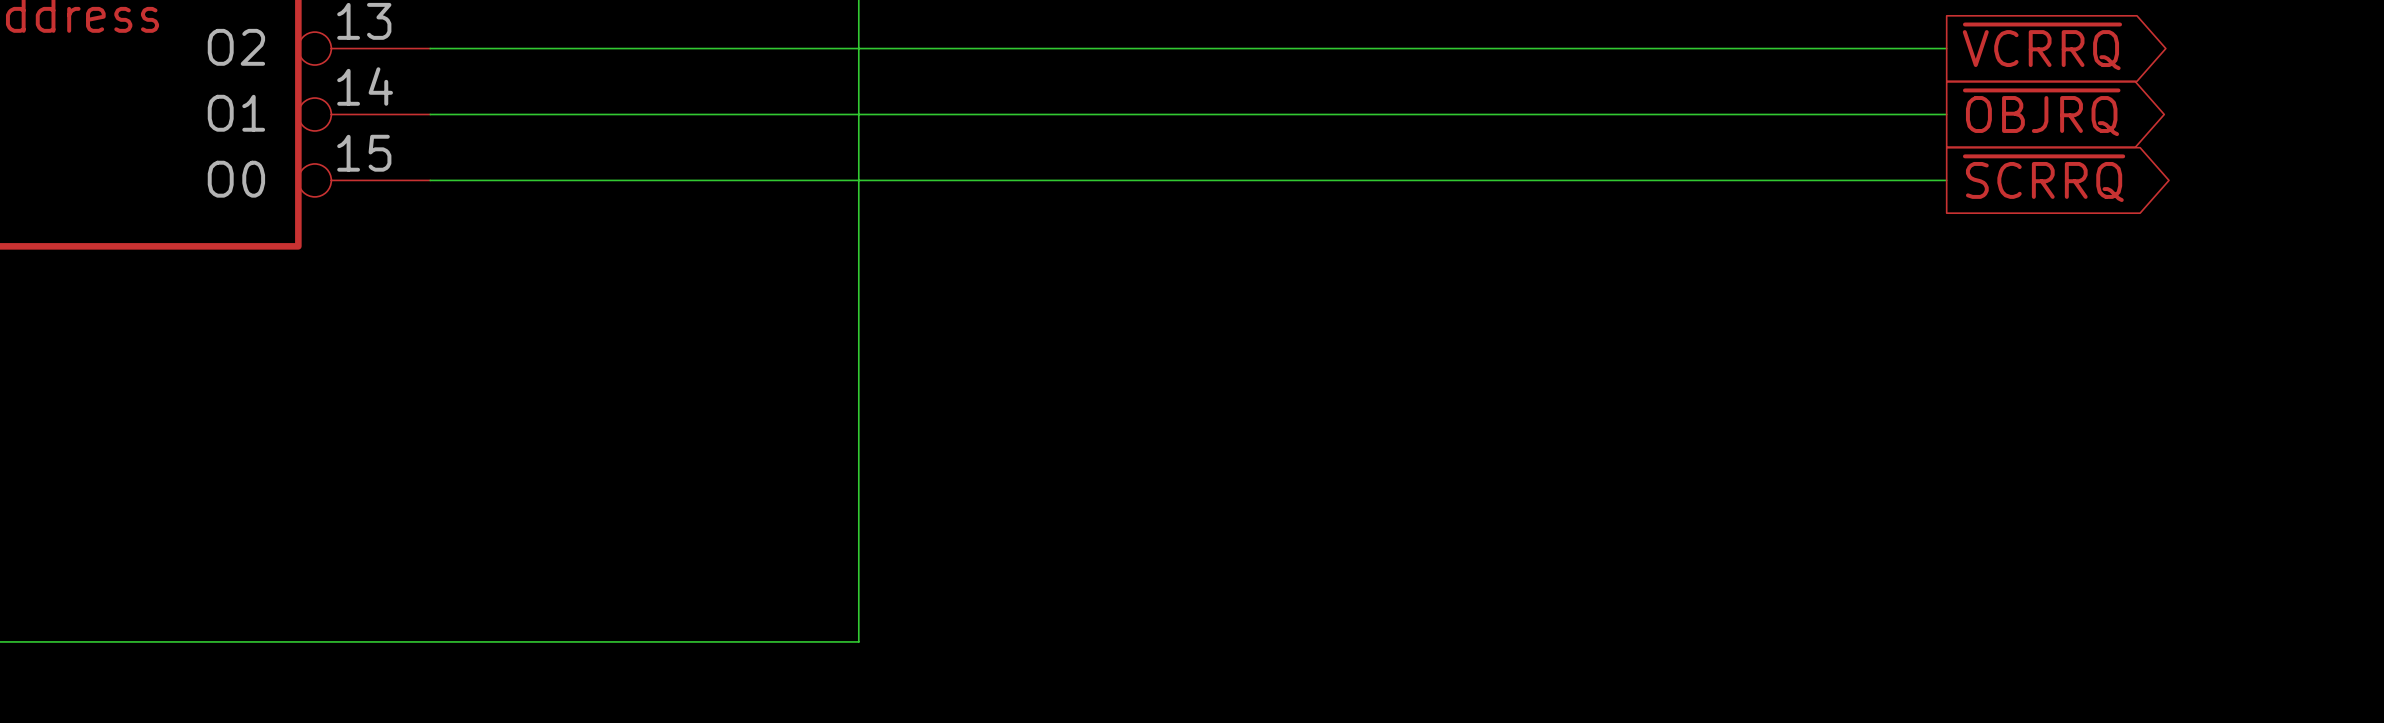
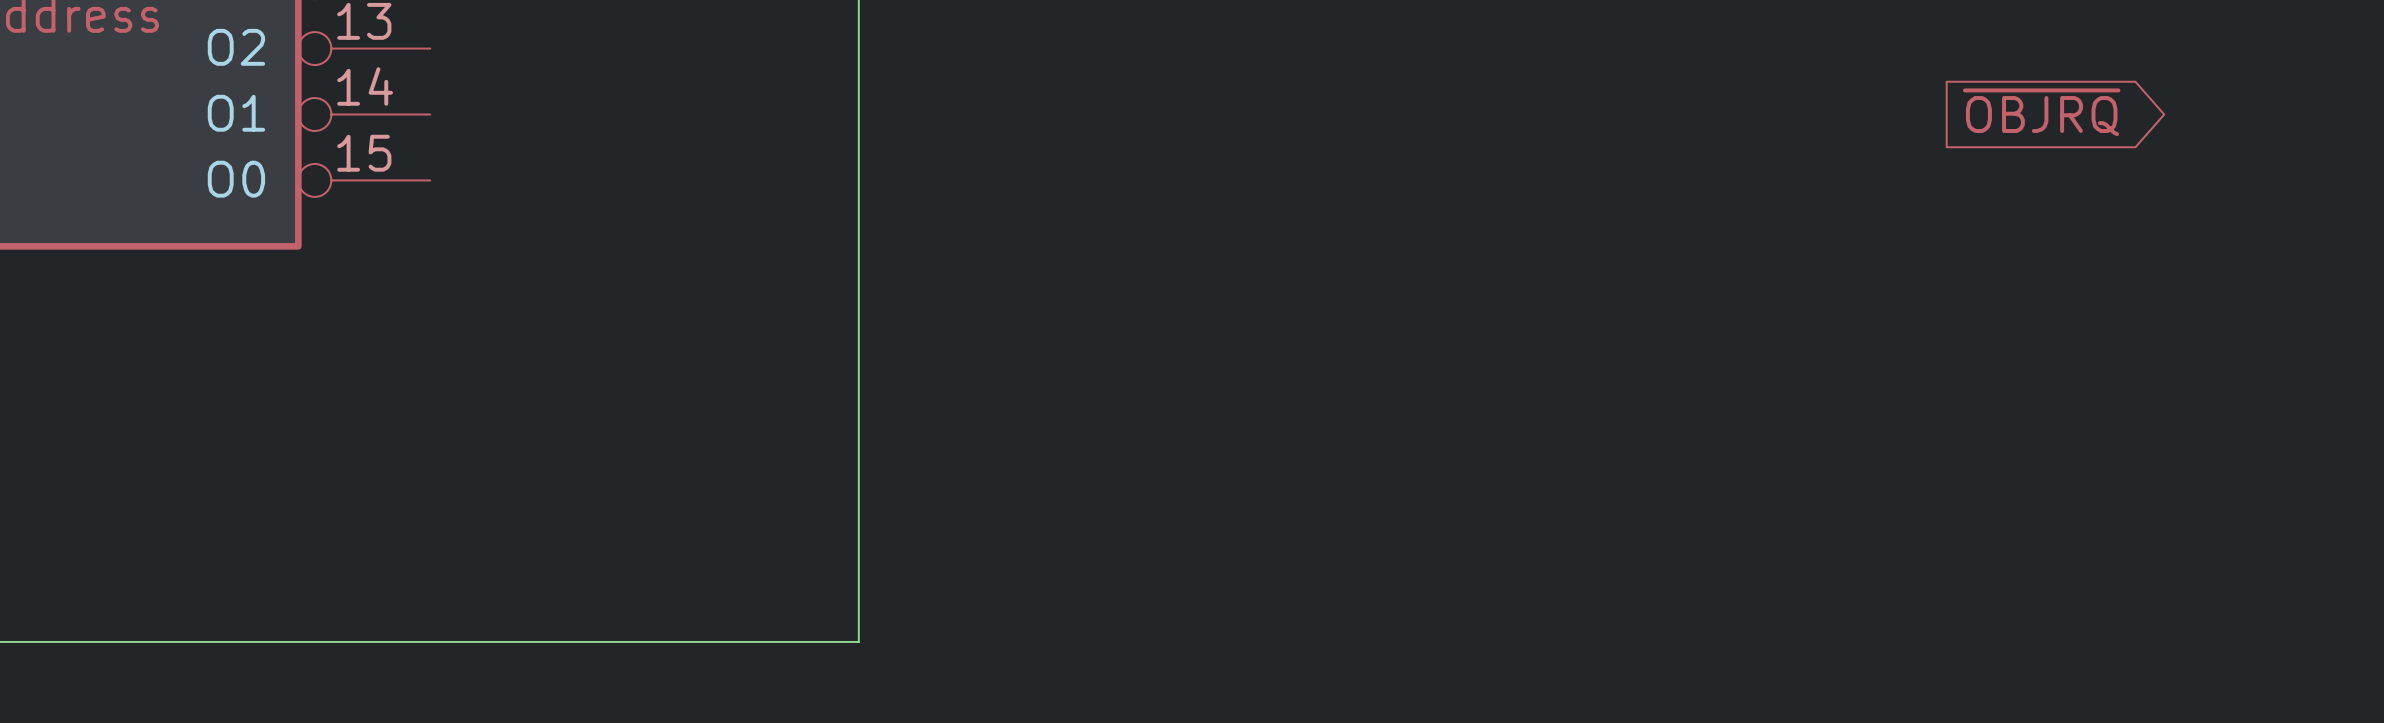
global label: ~{VCRRQ} (2042, 46) -> none
wire: (430, 48) (1946, 48) -> none
wire: (430, 114) (1946, 114) -> none
global label: ~{SCRRQ} (2044, 178) -> none
wire: (430, 180) (1946, 180) -> none

